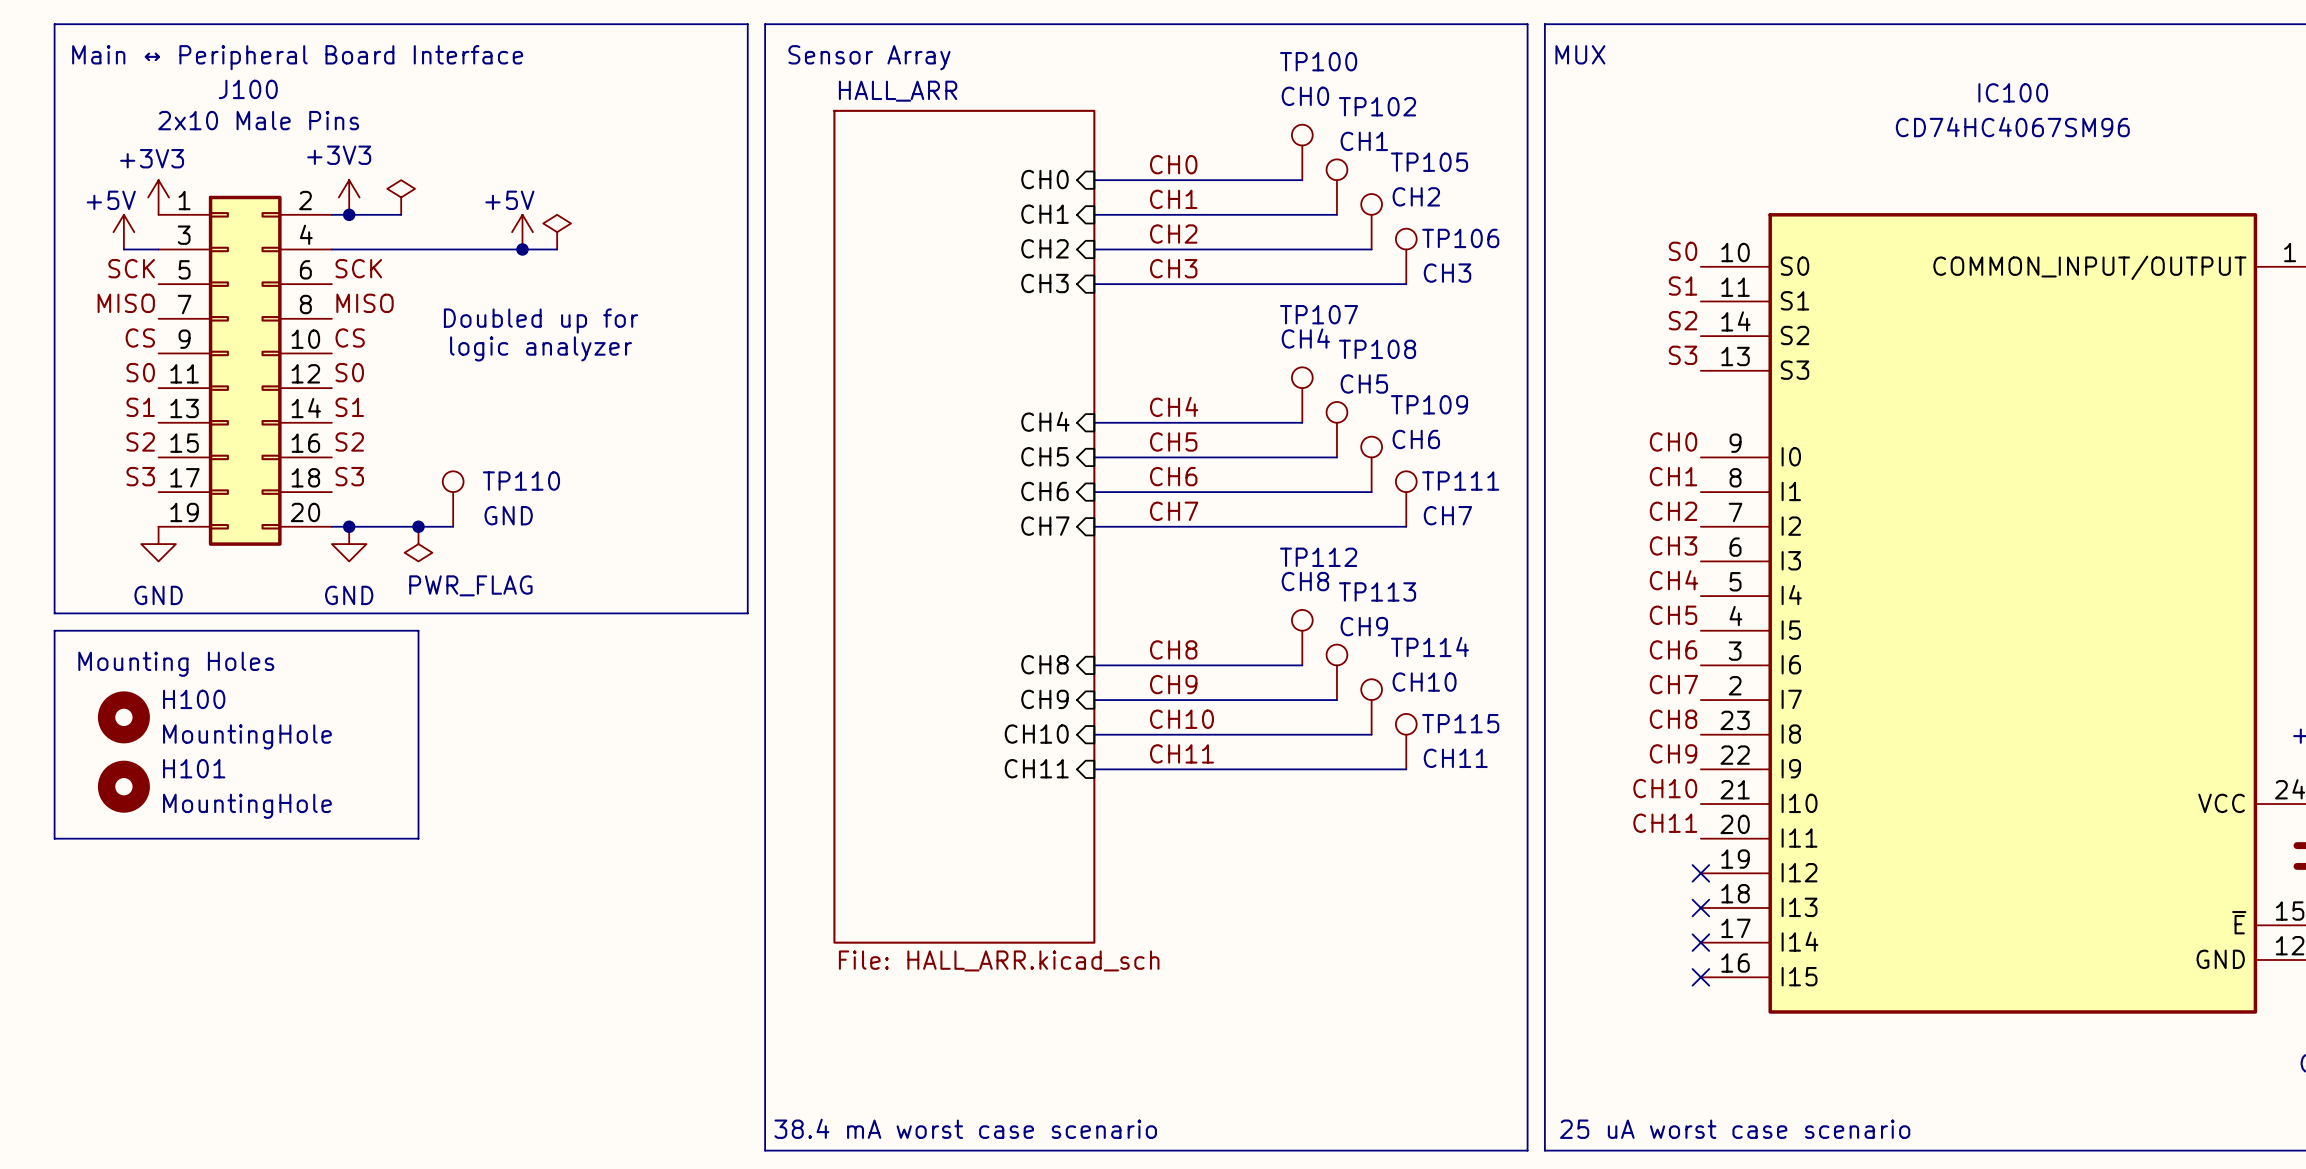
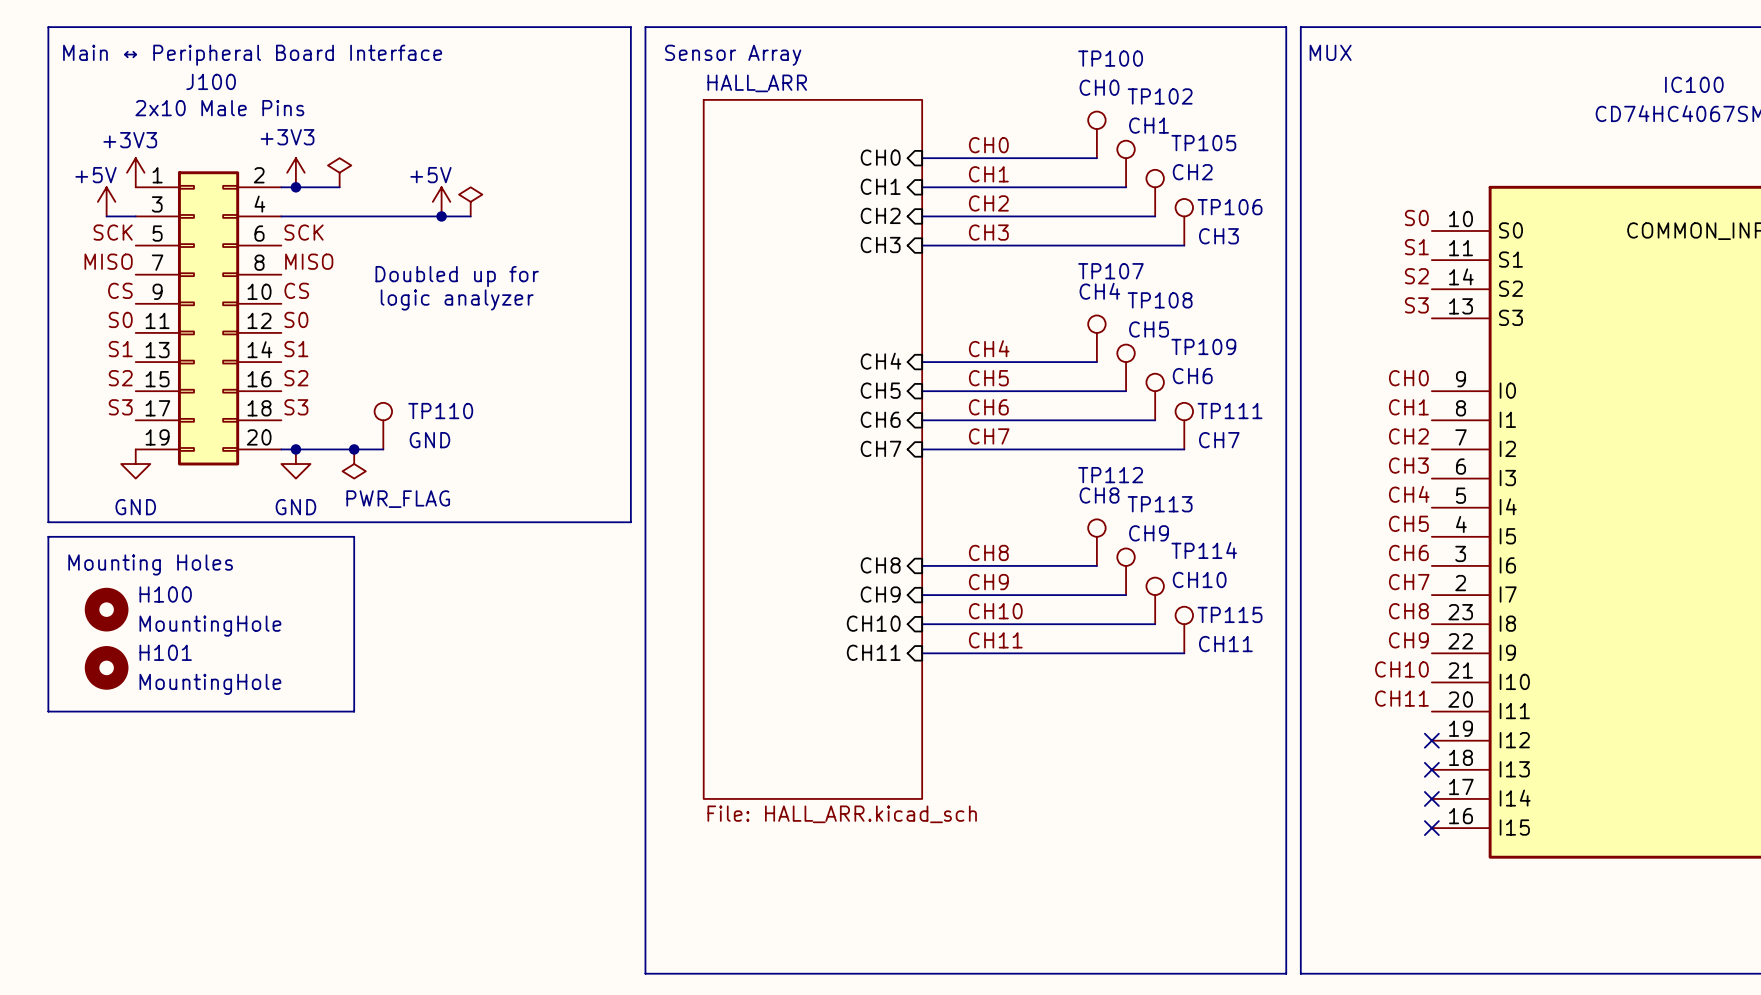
text: 38.4 mA worst case scenario (965, 1128) -> none
text: 25 uA worst case scenario (1735, 1129) -> none

